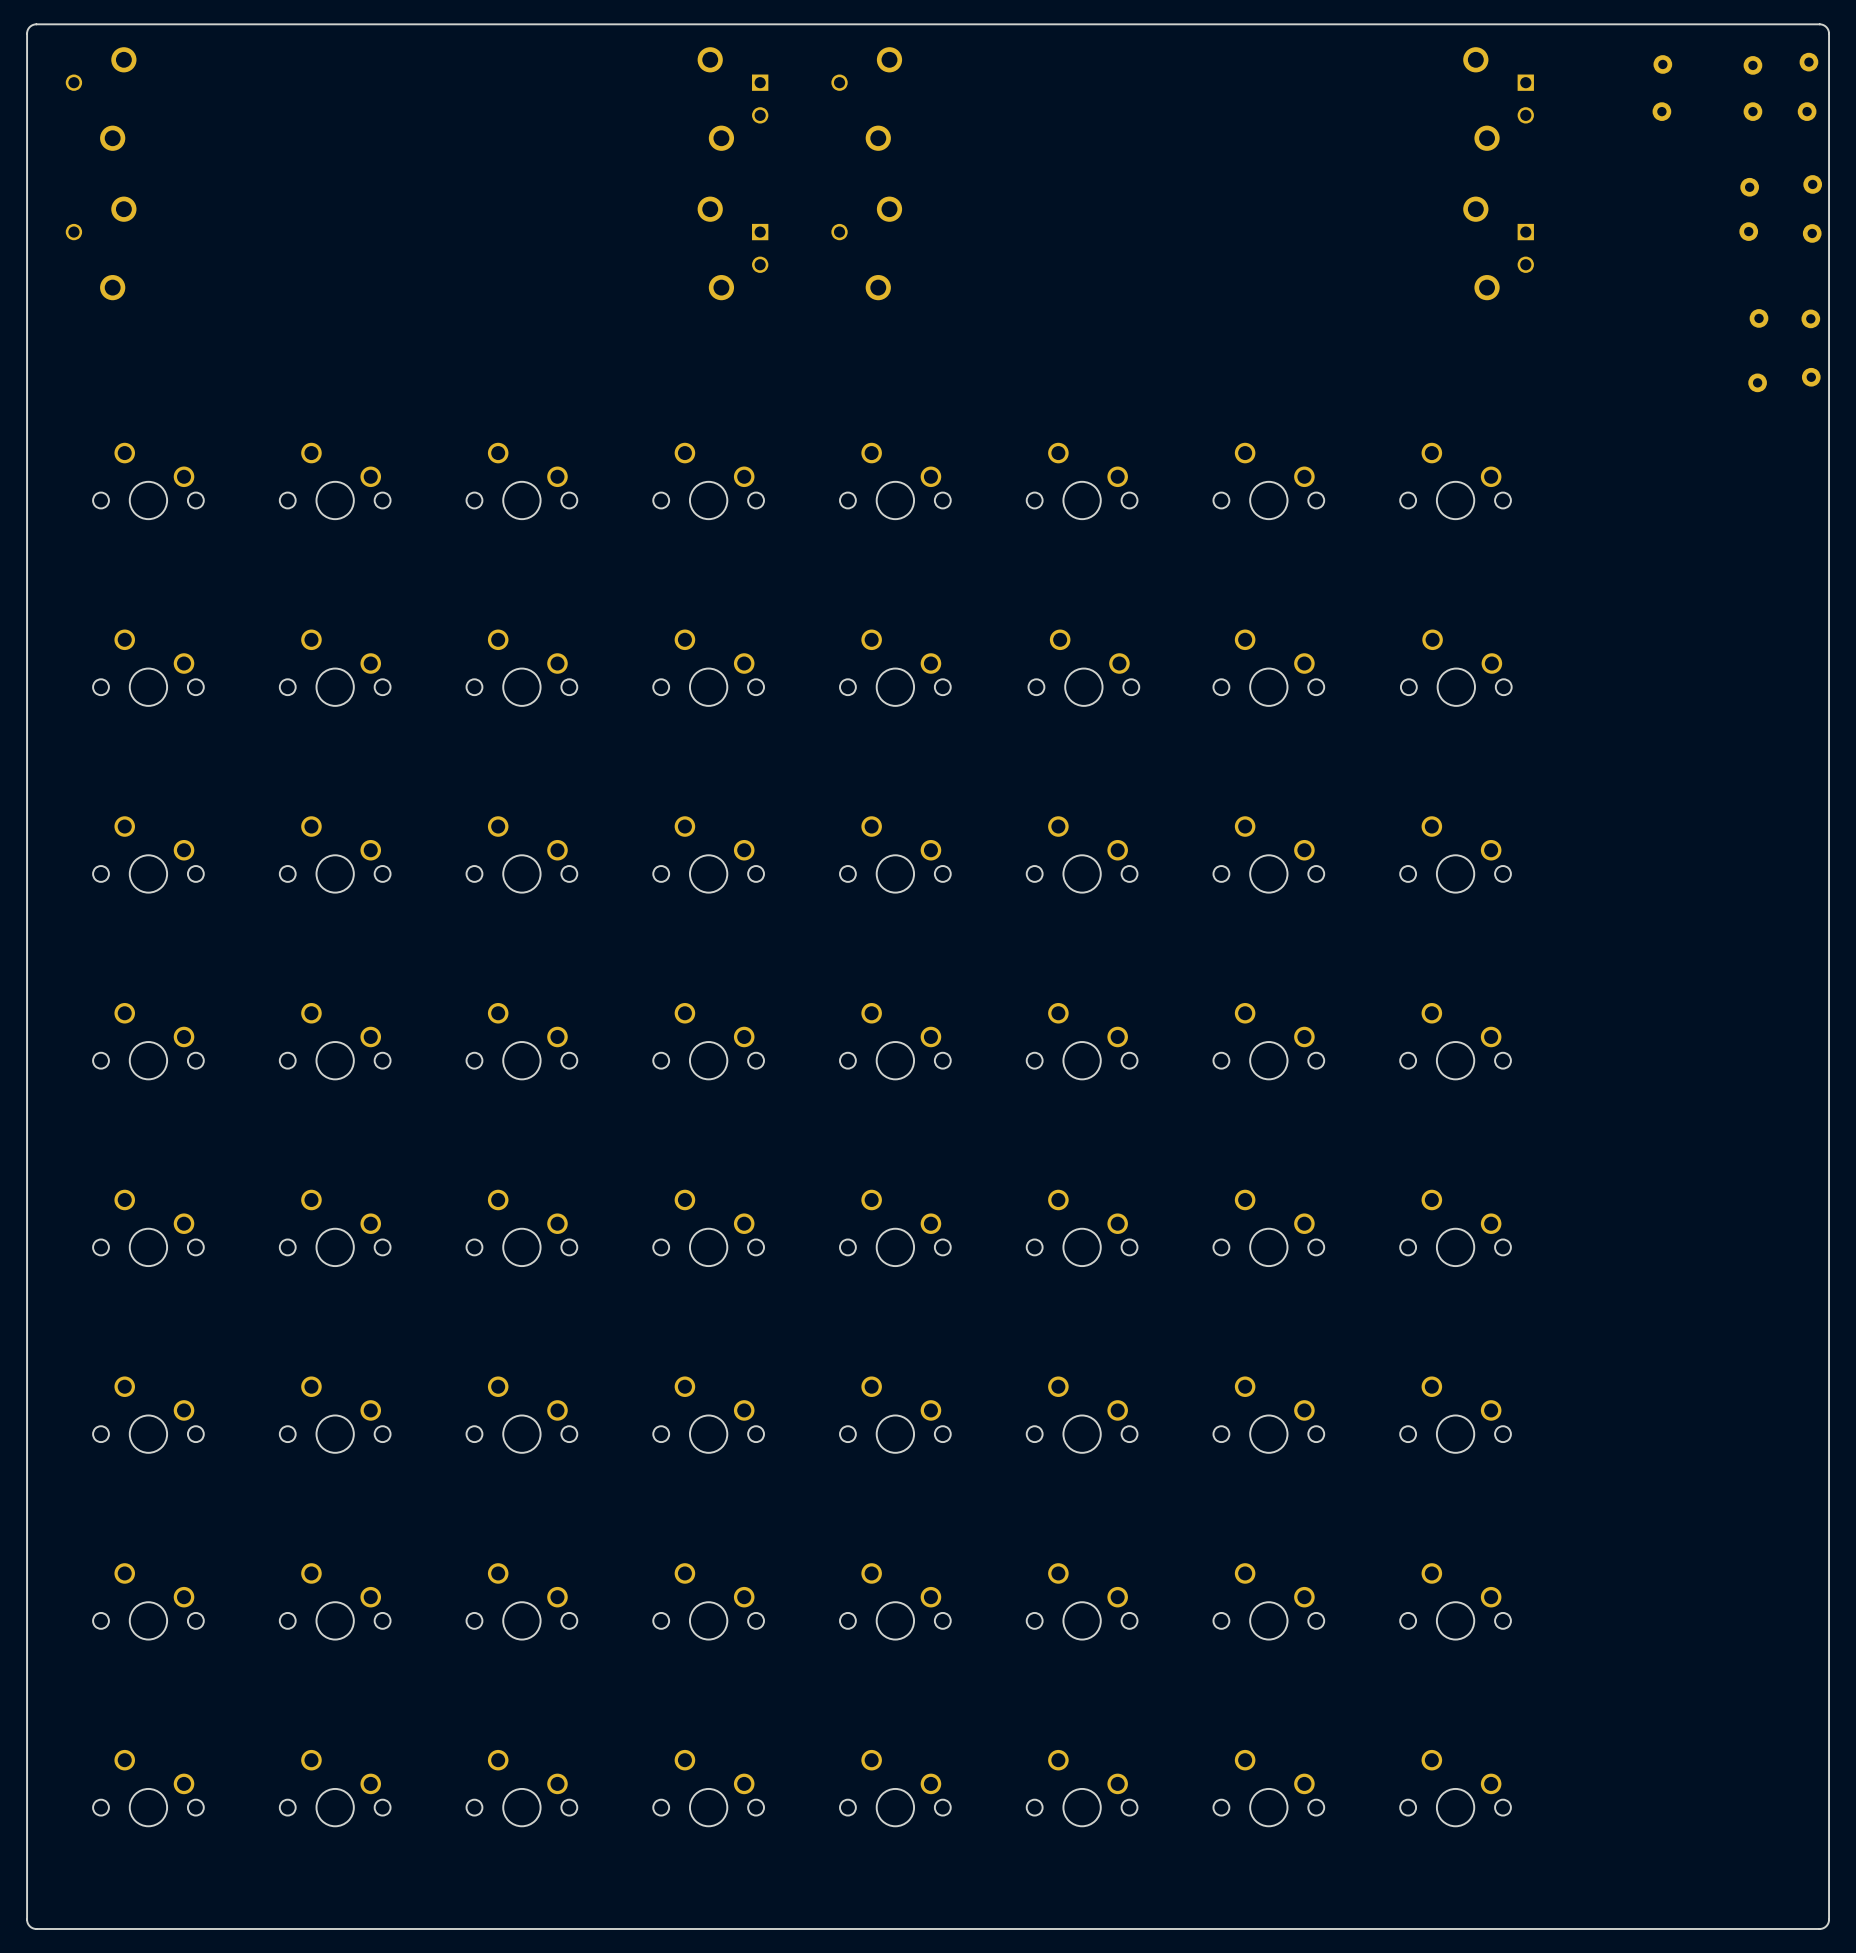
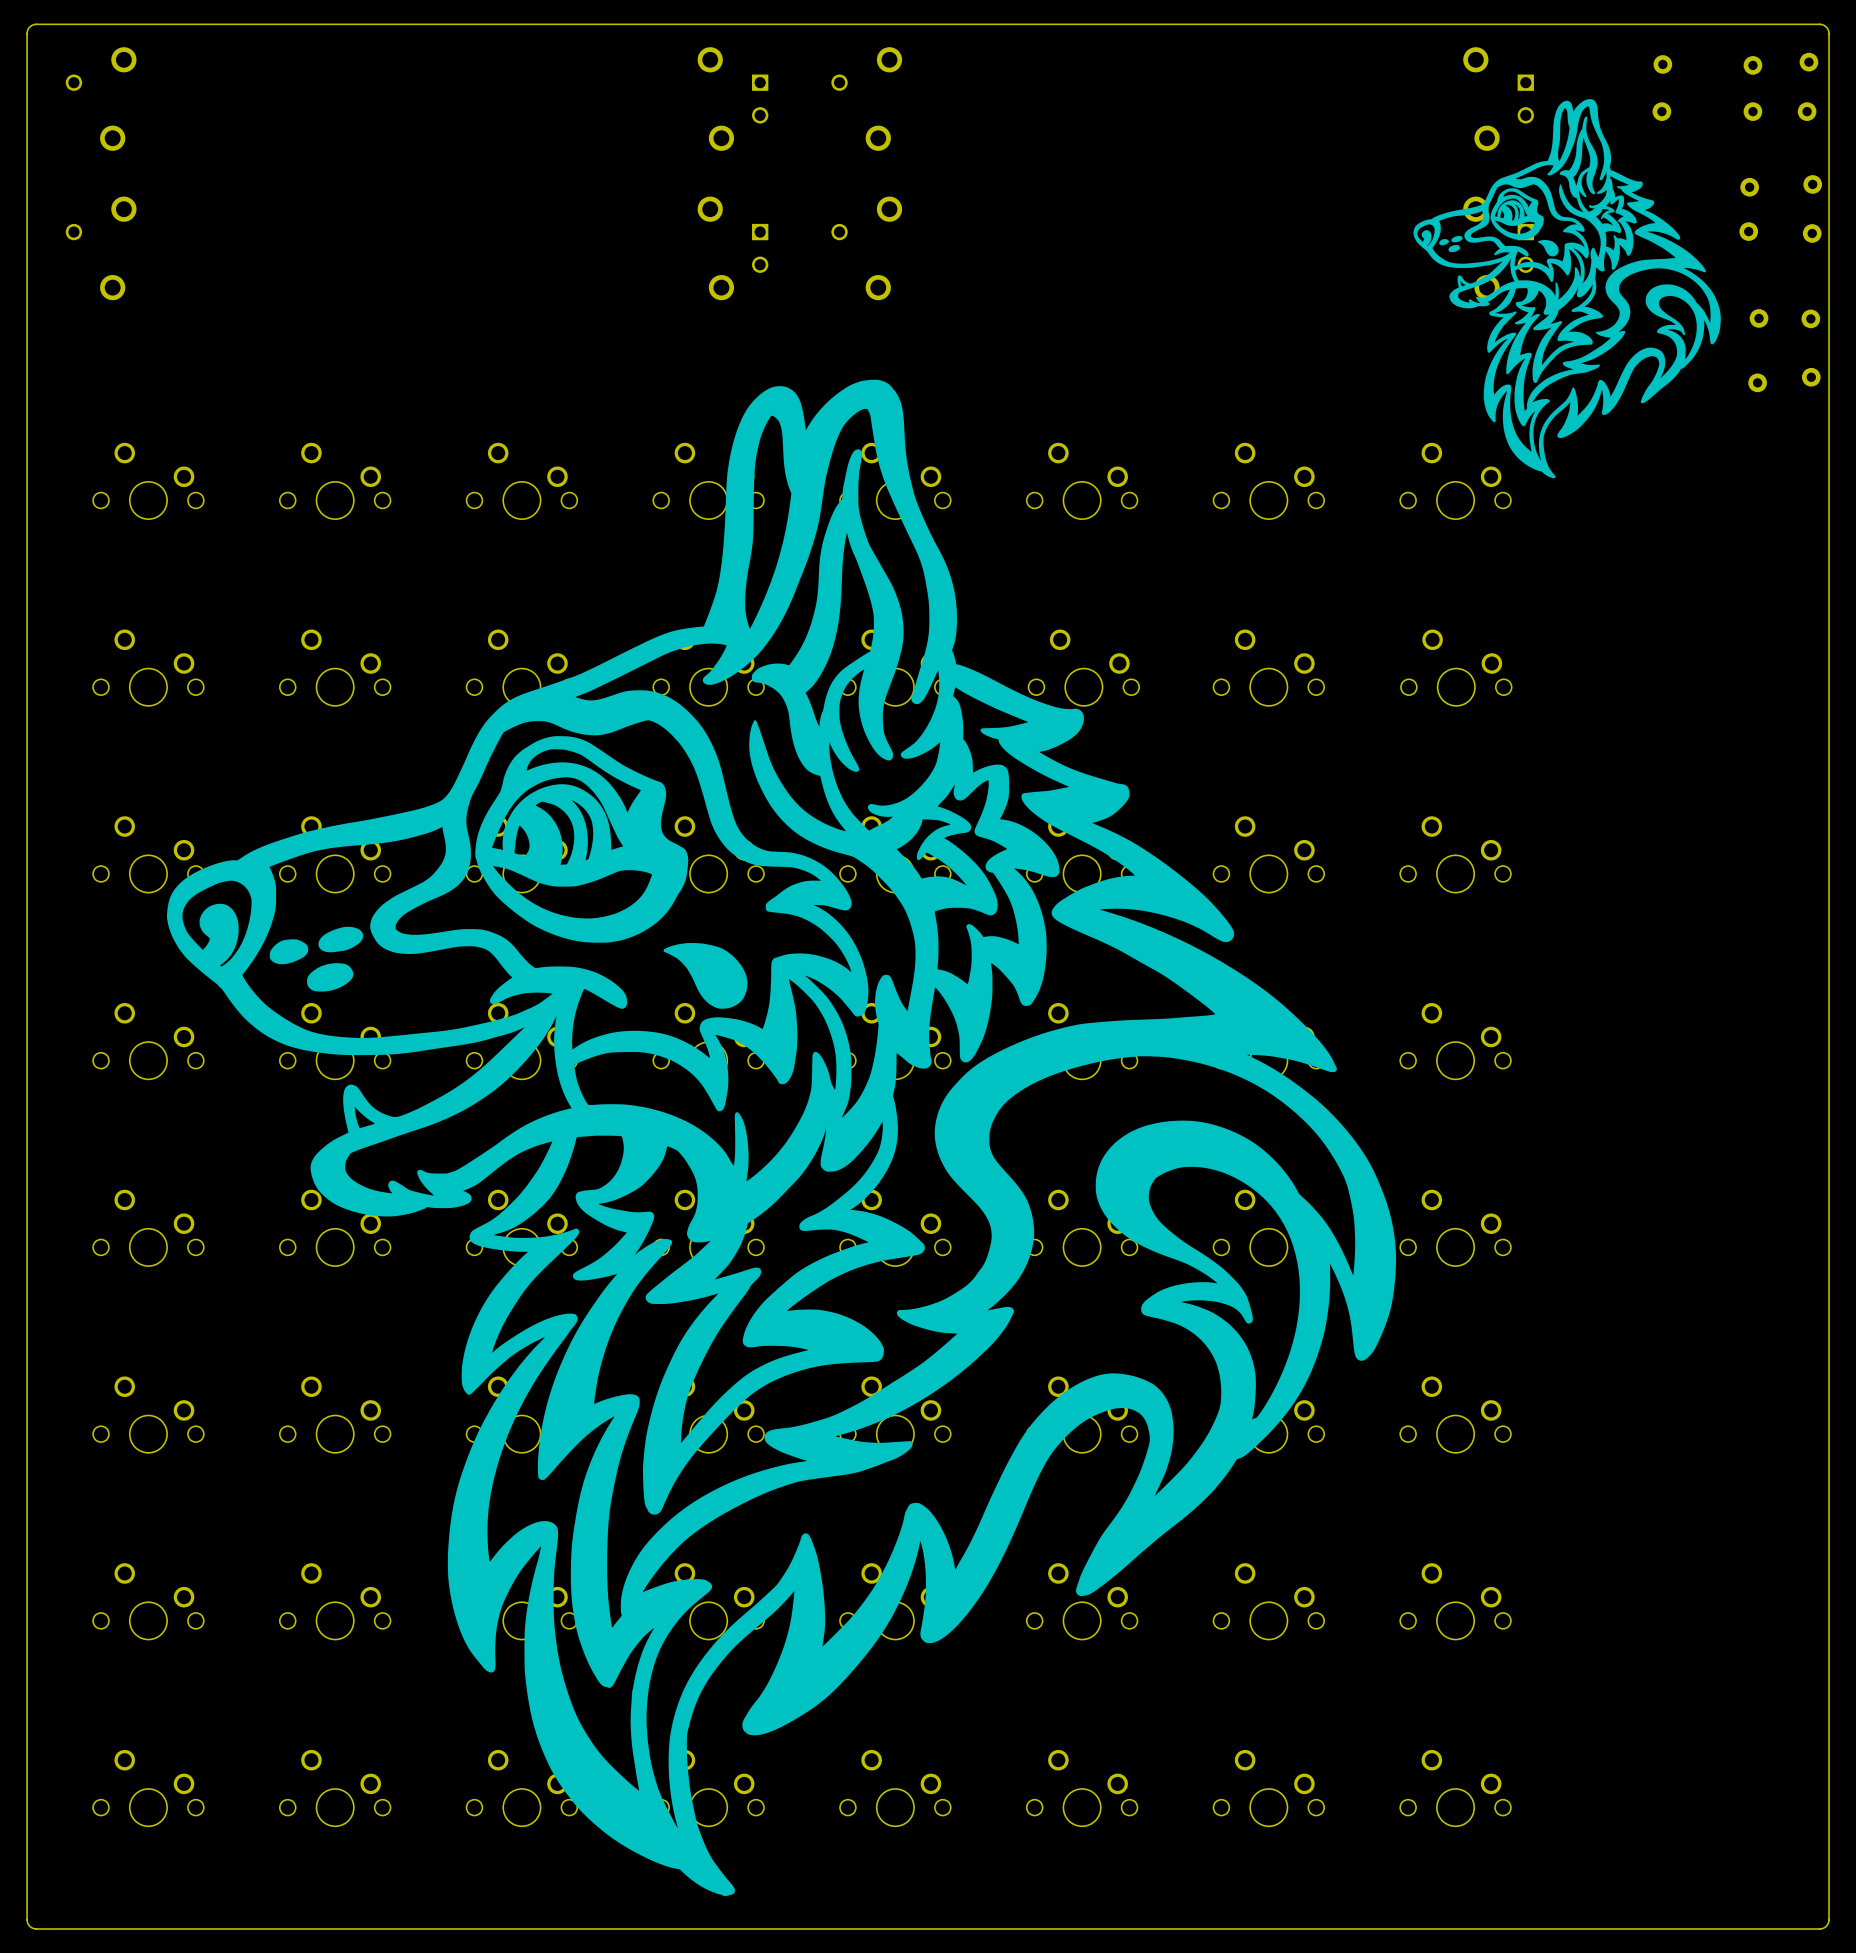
drawing: none -> [1413, 99, 1721, 479]
drawing: none -> [167, 379, 1397, 1897]

